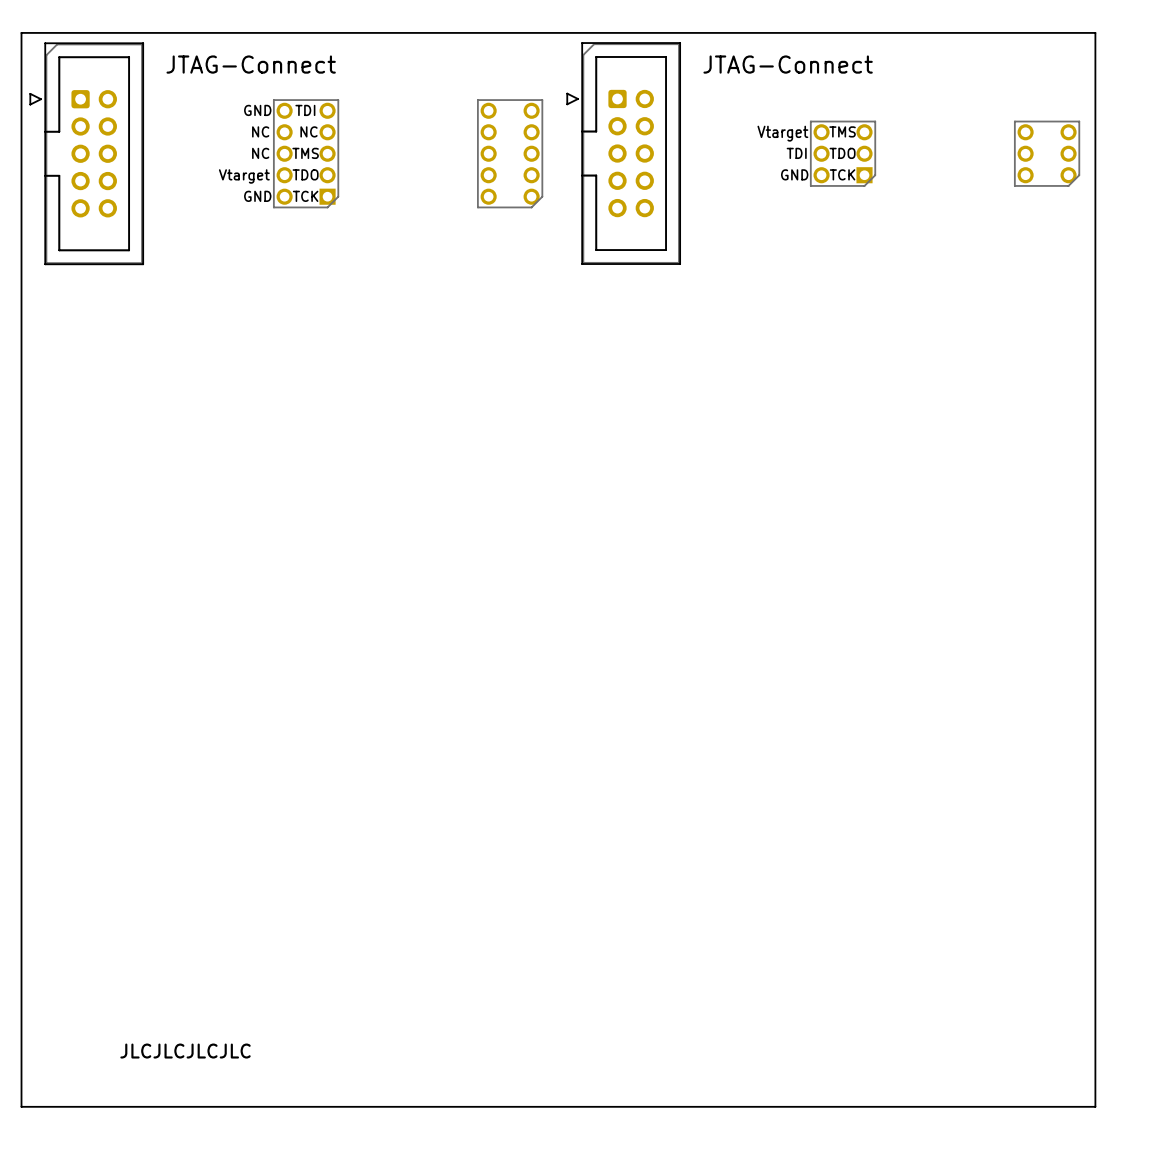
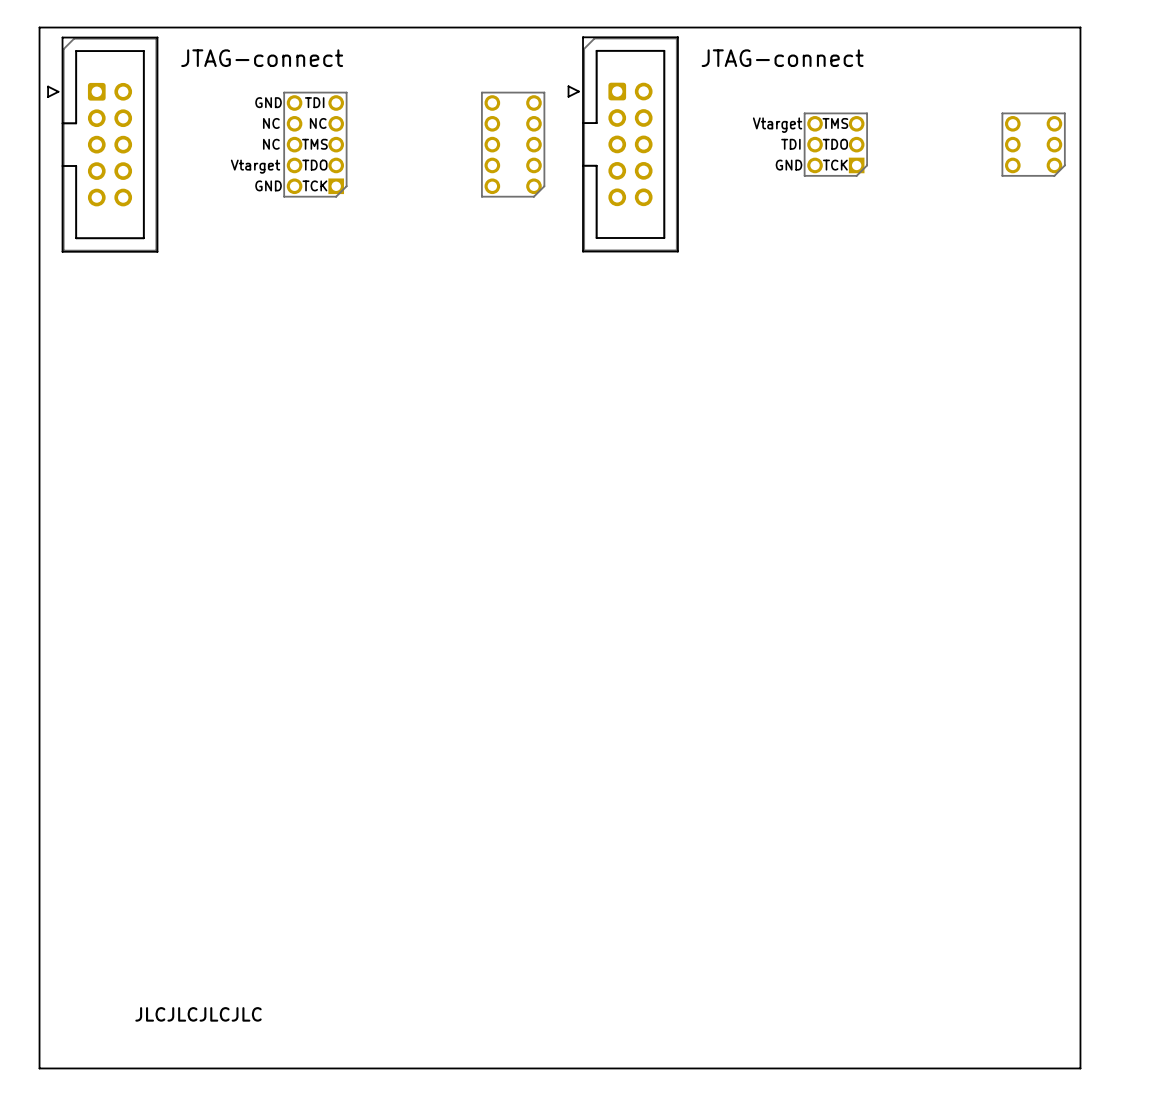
text: JTAG-Connect (251, 64) -> JTAG-connect (262, 58)
text: JTAG-Connect (788, 64) -> JTAG-connect (782, 58)

